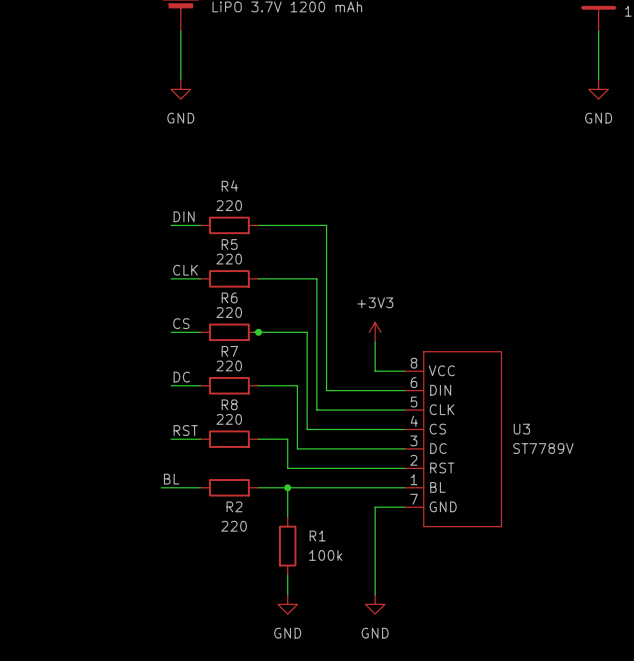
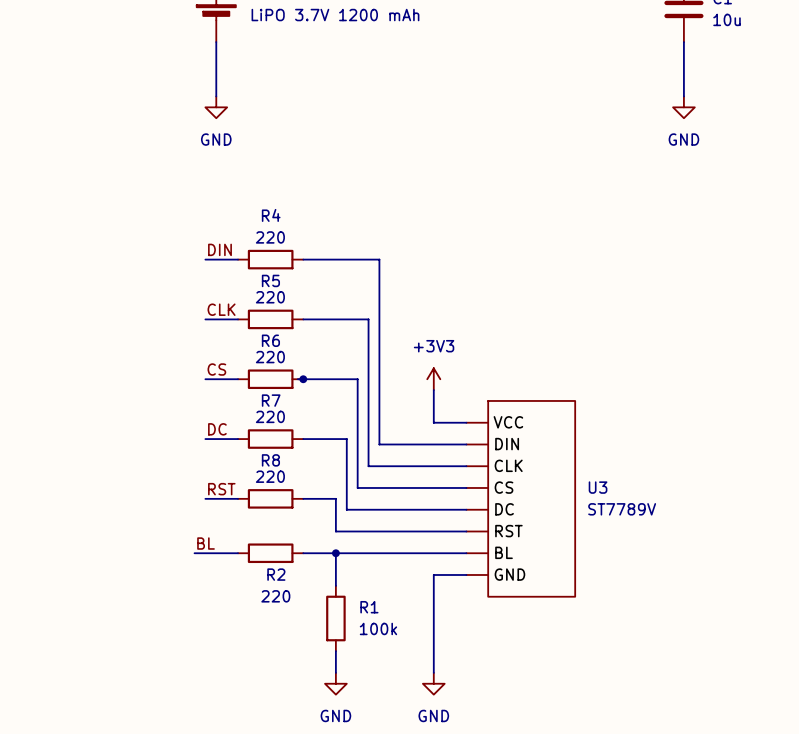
U3 pin number: 8 (414, 363) -> none
U3 pin number: 6 (414, 382) -> none
U3 pin number: 5 (414, 402) -> none
U3 pin number: 4 (414, 421) -> none
U3 pin number: 3 (413, 440) -> none
U3 pin number: 2 (413, 460) -> none
U3 pin number: 1 (414, 479) -> none
U3 pin number: 7 (414, 499) -> none

